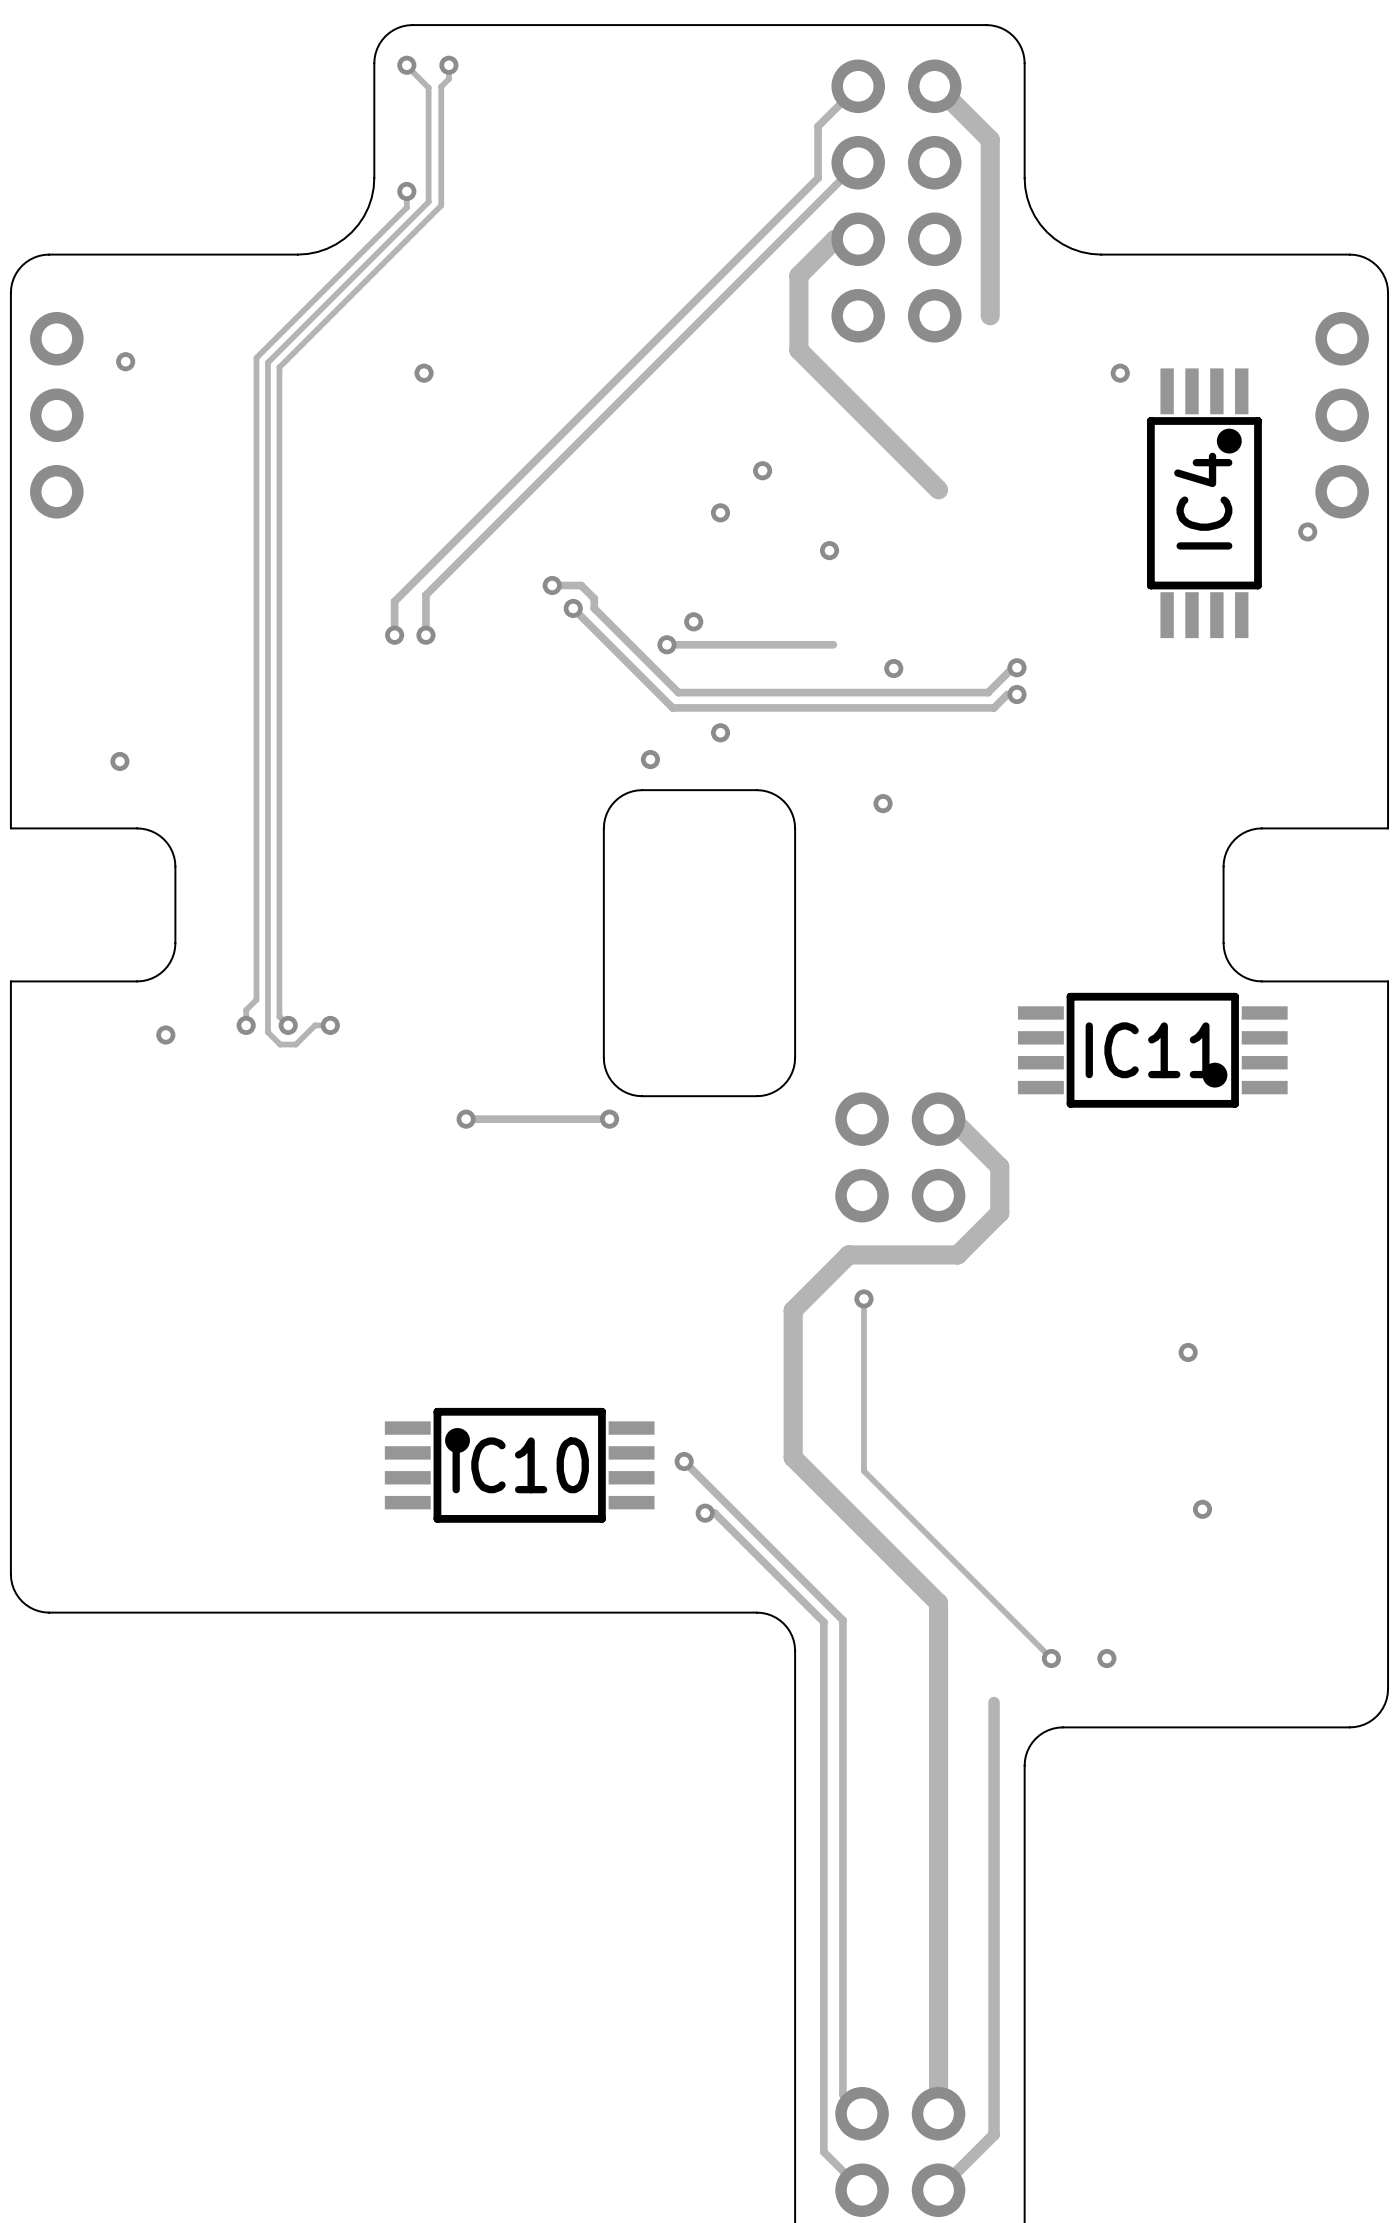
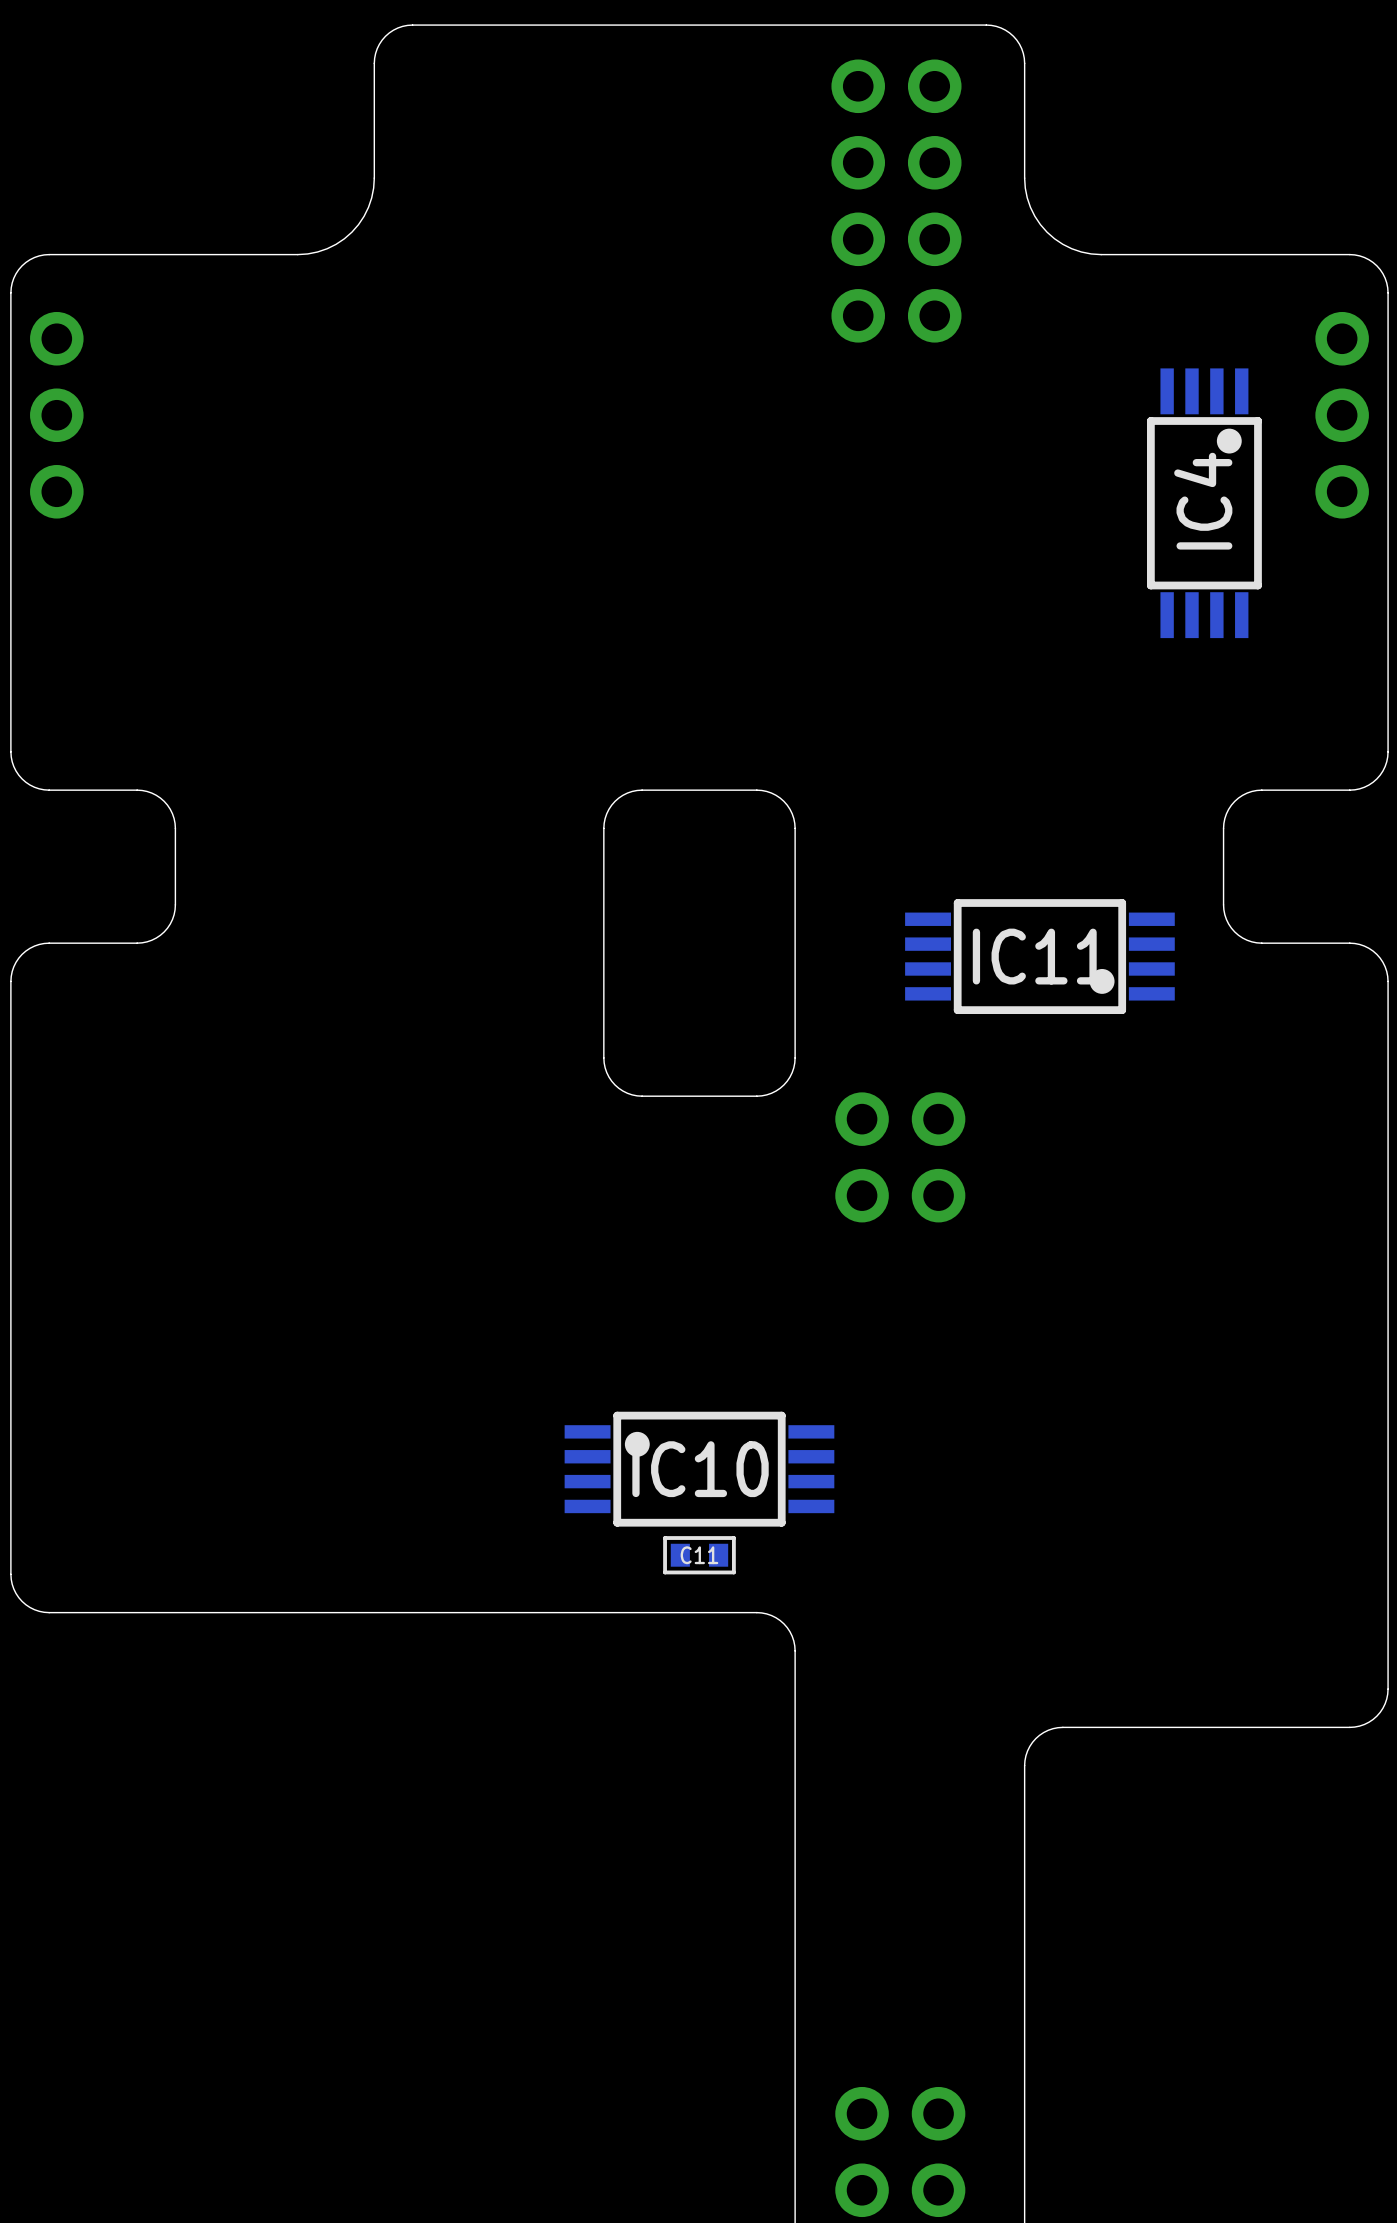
via: (406, 65) -> none
track: (448, 65) (448, 79) (441, 86) (441, 205) (279, 367) (279, 1016) (288, 1025) -> none
via: (448, 65) -> none
track: (406, 66) (428, 87) (428, 201) (267, 362) (267, 1032) (280, 1044) (295, 1044) (315, 1025) (330, 1025) -> none
track: (858, 86) (818, 126) (818, 178) (394, 601) (394, 635) -> none
track: (934, 86) (990, 139) (990, 315) -> none
track: (858, 162) (425, 595) (425, 635) -> none
track: (406, 191) (406, 207) (256, 357) (256, 999) (246, 1010) (246, 1025) -> none
via: (406, 191) -> none
track: (858, 239) (835, 239) (798, 275) (798, 350) (938, 489) -> none
via: (125, 361) -> none
via: (424, 373) -> none
via: (1120, 373) -> none
via: (762, 470) -> none
via: (720, 512) -> none
via: (1307, 531) -> none
via: (829, 550) -> none
track: (552, 585) (581, 585) (594, 598) (594, 608) (678, 692) (988, 692) (1012, 667) (1016, 667) -> none
via: (552, 585) -> none
track: (573, 608) (672, 707) (994, 707) (1007, 694) (1016, 694) -> none
via: (573, 608) -> none
via: (693, 621) -> none
via: (394, 635) -> none
via: (425, 635) -> none
via: (666, 644) -> none
track: (833, 644) (666, 644) -> none
via: (1016, 667) -> none
via: (893, 668) -> none
via: (1016, 694) -> none
via: (720, 732) -> none
board edge: (10, 751) (10, 828) (147, 829) (160, 836) (167, 843) (172, 852) (175, 866) -> (10, 751) (13, 766) (18, 775) (25, 782) (39, 788) (142, 790) (160, 798) (167, 805) (174, 818) (175, 866)
board edge: (1388, 751) (1388, 828) (1251, 829) (1238, 836) (1231, 843) (1226, 852) (1223, 866) -> (1388, 751) (1385, 766) (1380, 775) (1373, 782) (1359, 788) (1256, 790) (1238, 798) (1231, 805) (1224, 818) (1223, 866)
via: (650, 759) -> none
via: (119, 761) -> none
via: (883, 803) -> none
board edge: (175, 904) (174, 953) (167, 966) (151, 978) (137, 981) (10, 981) -> (175, 904) (172, 919) (167, 928) (151, 940) (137, 943) (39, 944) (25, 951) (18, 958) (13, 966) (10, 981)
board edge: (1223, 904) (1224, 953) (1231, 966) (1247, 978) (1261, 981) (1388, 981) -> (1223, 904) (1226, 919) (1231, 928) (1247, 940) (1261, 943) (1359, 944) (1373, 951) (1380, 958) (1385, 966) (1388, 981)
via: (246, 1025) -> none
via: (288, 1025) -> none
via: (330, 1025) -> none
via: (165, 1034) -> none
IC11 position: (1152, 1050) -> (1039, 956)
via: (466, 1119) -> none
track: (609, 1119) (466, 1119) -> none
via: (609, 1119) -> none
track: (938, 1119) (951, 1119) (999, 1166) (999, 1212) (957, 1254) (848, 1254) (793, 1310) (793, 1457) (938, 1603) (938, 2113) -> none
track: (863, 1298) (863, 1471) (1051, 1658) -> none
via: (863, 1298) -> none
via: (1188, 1352) -> none
track: (684, 1461) (842, 1620) (842, 2094) (862, 2113) -> none
via: (684, 1461) -> none
IC10 position: (519, 1465) -> (699, 1469)
via: (1202, 1509) -> none
track: (705, 1513) (714, 1513) (823, 1622) (823, 2152) (862, 2190) -> none
via: (705, 1513) -> none
C11: none -> (699, 1555)
via: (1051, 1658) -> none
via: (1106, 1658) -> none
track: (994, 1702) (994, 2134) (938, 2190) -> none

